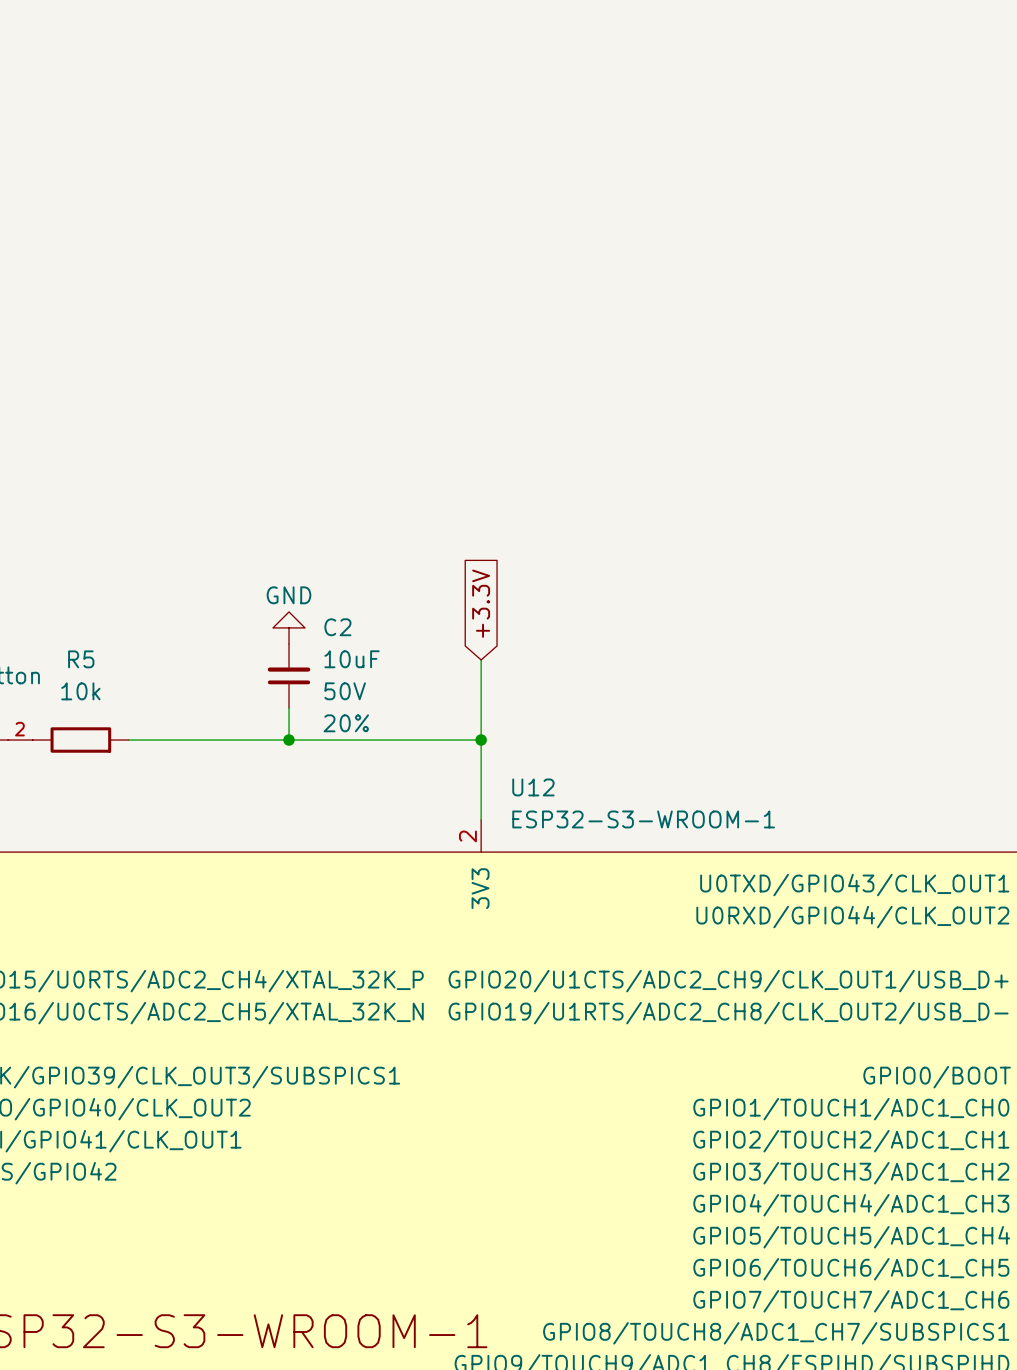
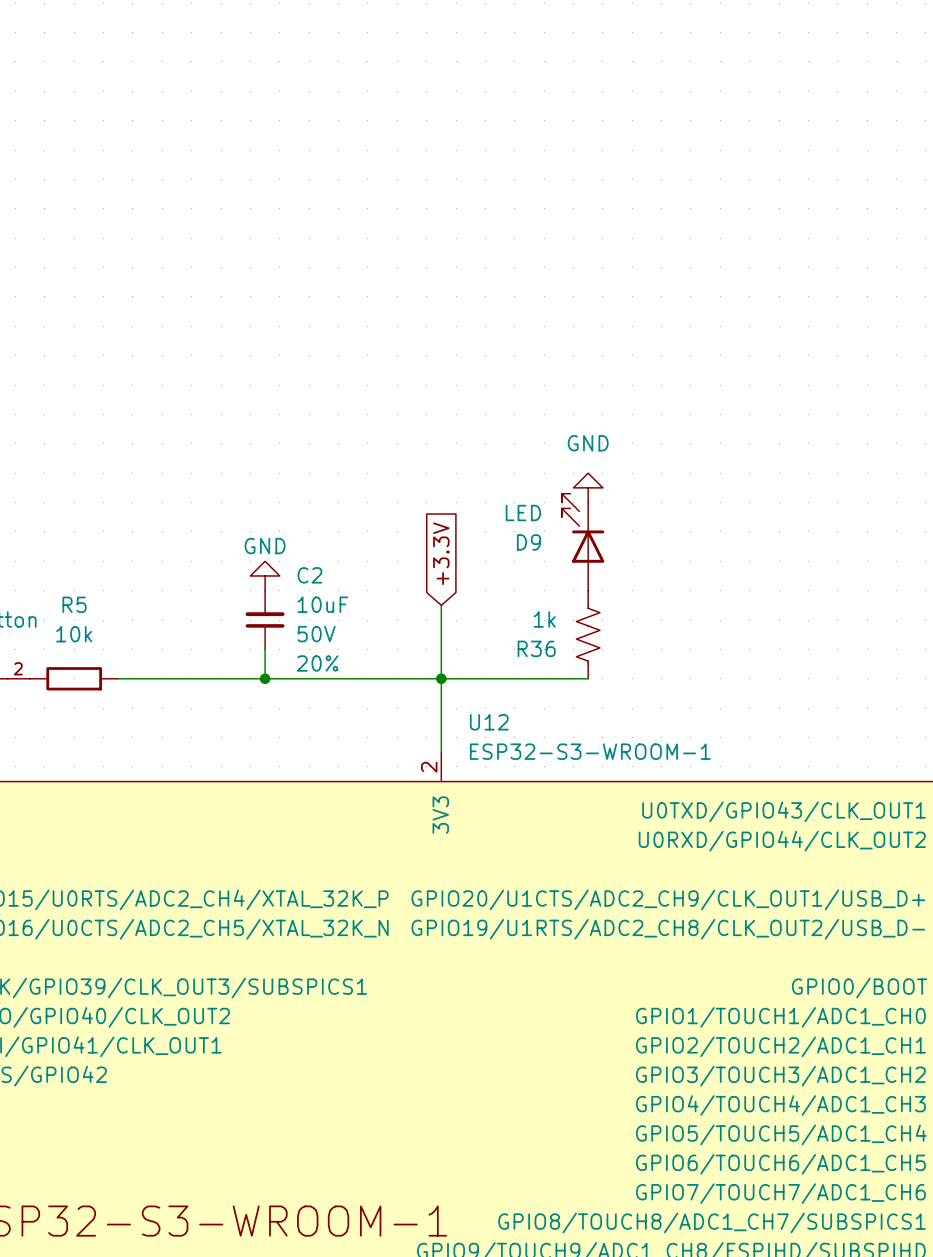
power symbol: none -> GND (588, 487)
D9: none -> LED (583, 542)
R36: none -> 1k (588, 634)
wire: none -> (441, 678) (588, 678)

